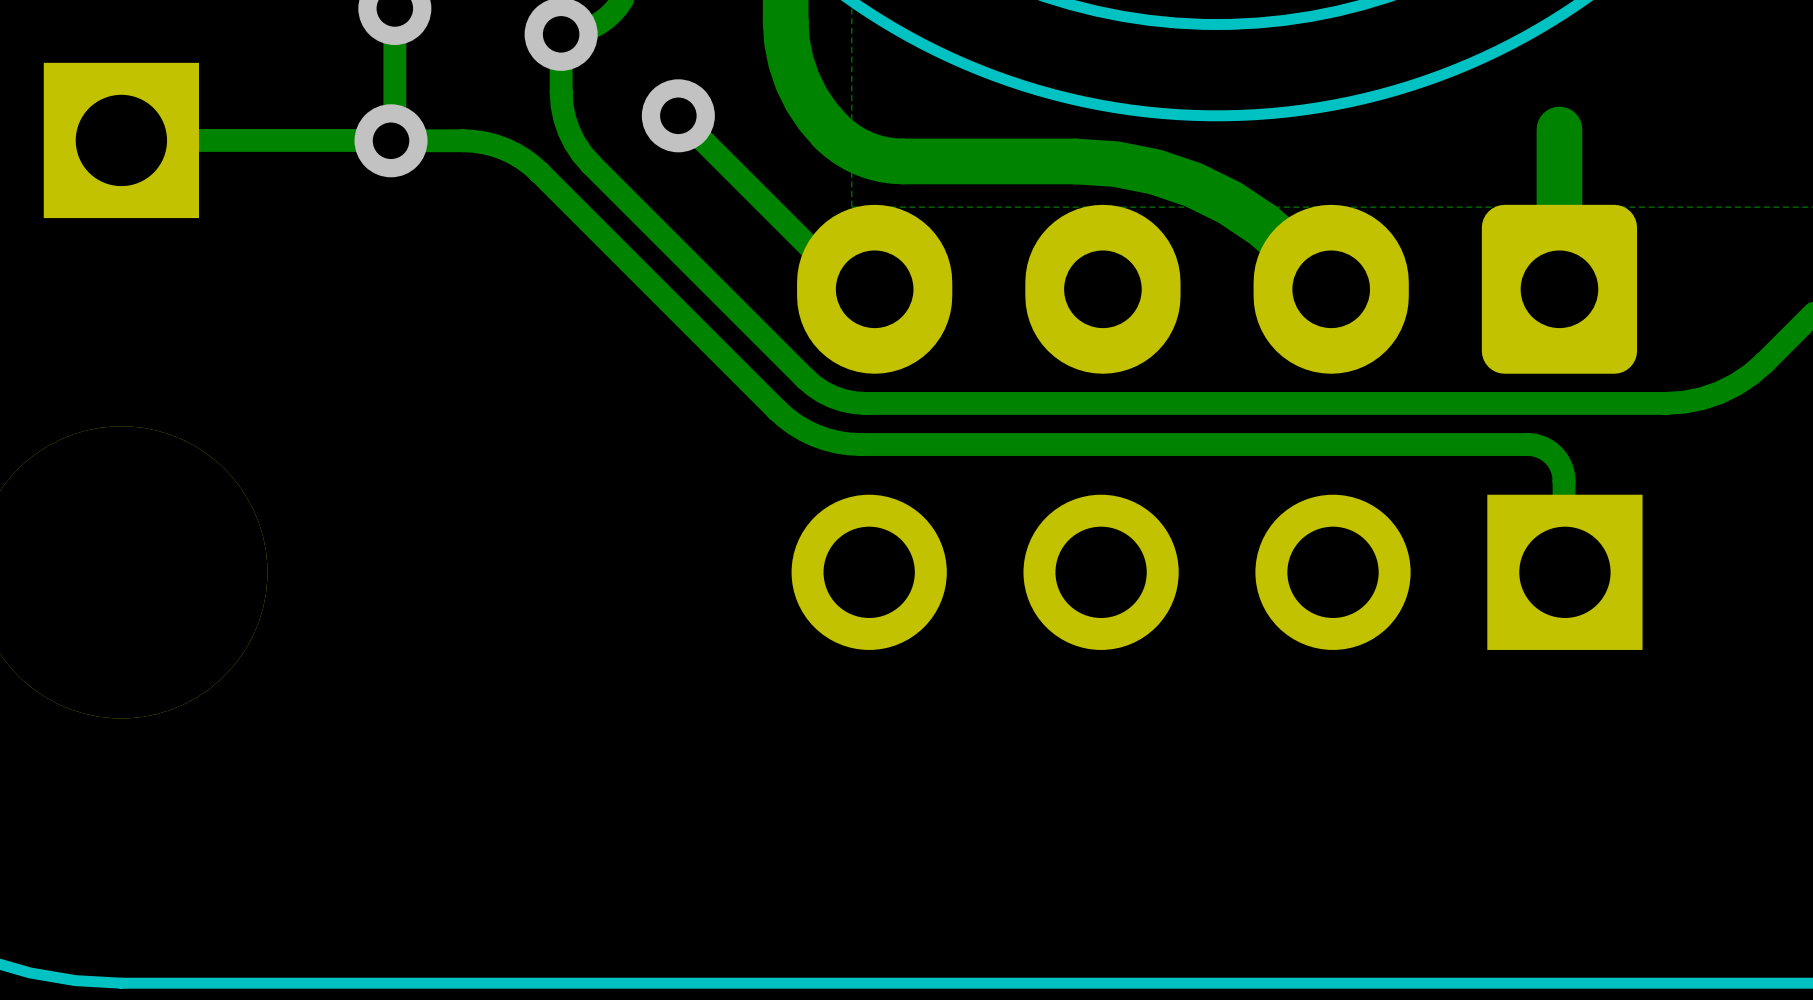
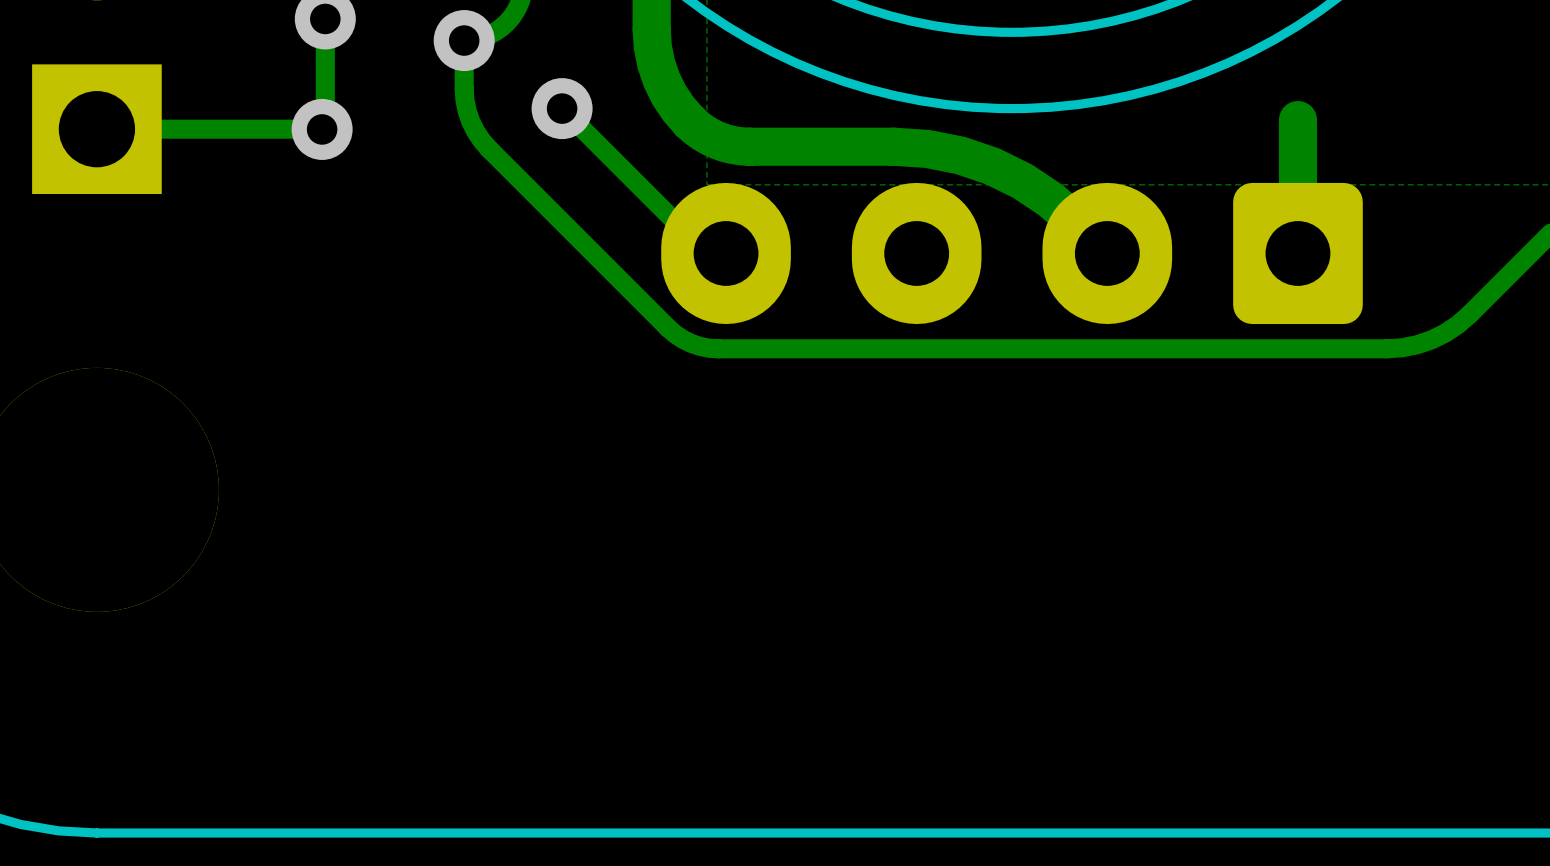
track: (390, 140) (473, 141) (494, 145) (523, 159) (539, 172) (776, 409) (794, 424) (815, 435) (837, 442) (860, 444) (1535, 445) (1553, 455) (1563, 472) (1564, 572) -> none
part: (1217, 572) -> none

